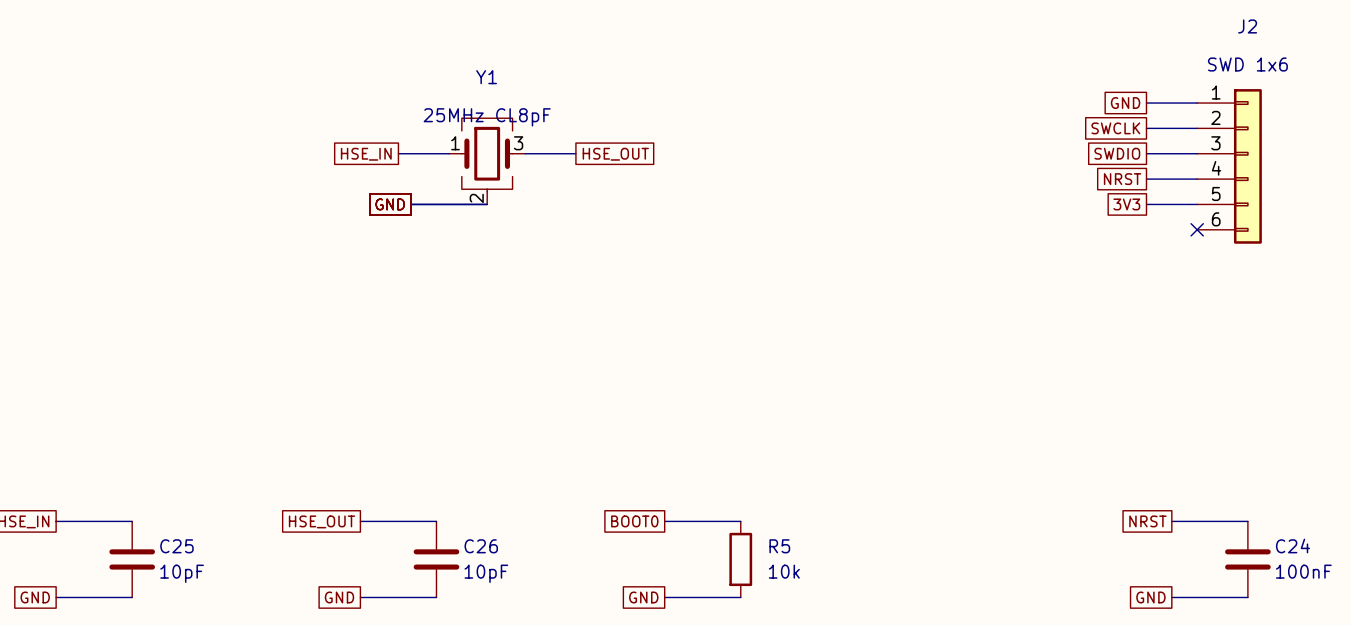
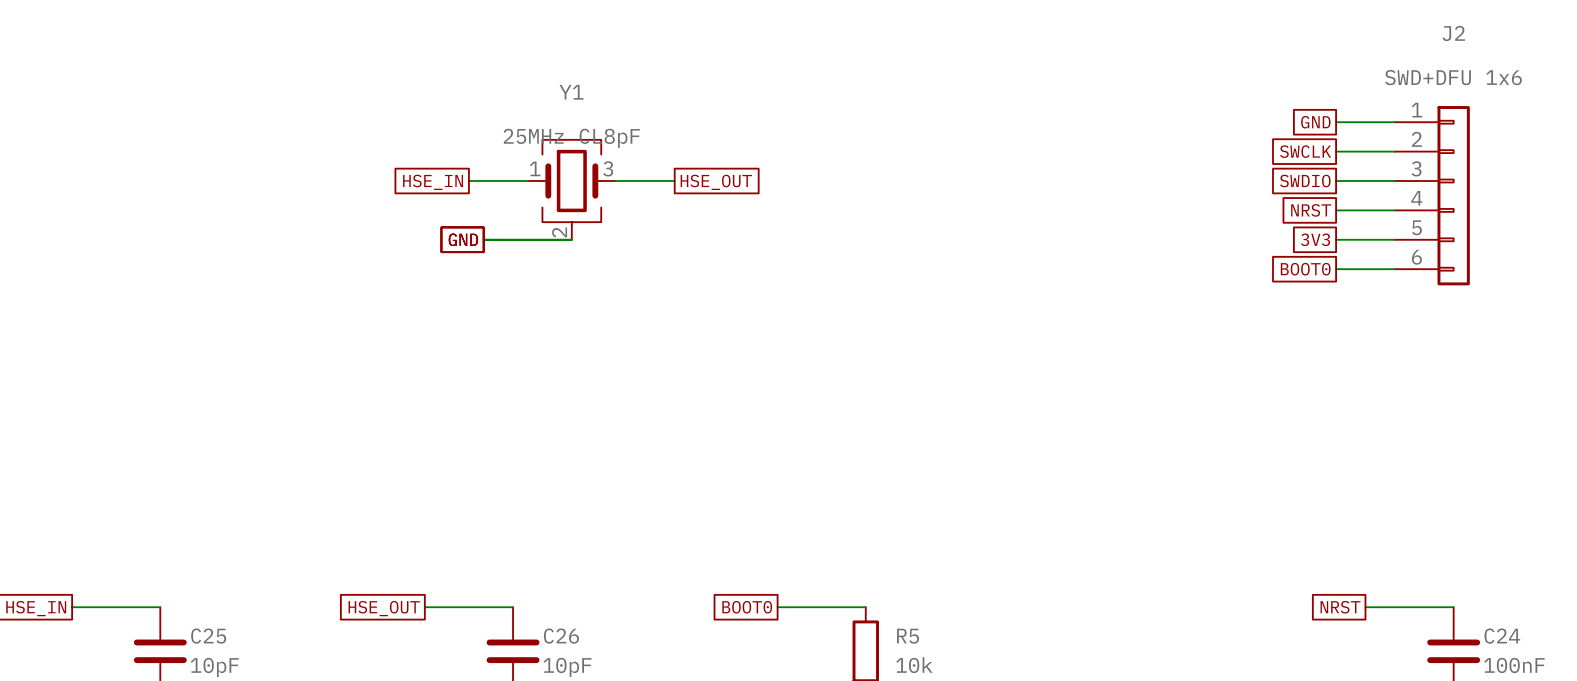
J2 value: SWD 1x6 (1247, 64) -> SWD+DFU 1x6 (1453, 77)
global label: none -> BOOT0 (1305, 269)
wire: none -> (1336, 269) (1394, 269)
no-connect mark: (1197, 229) -> none

